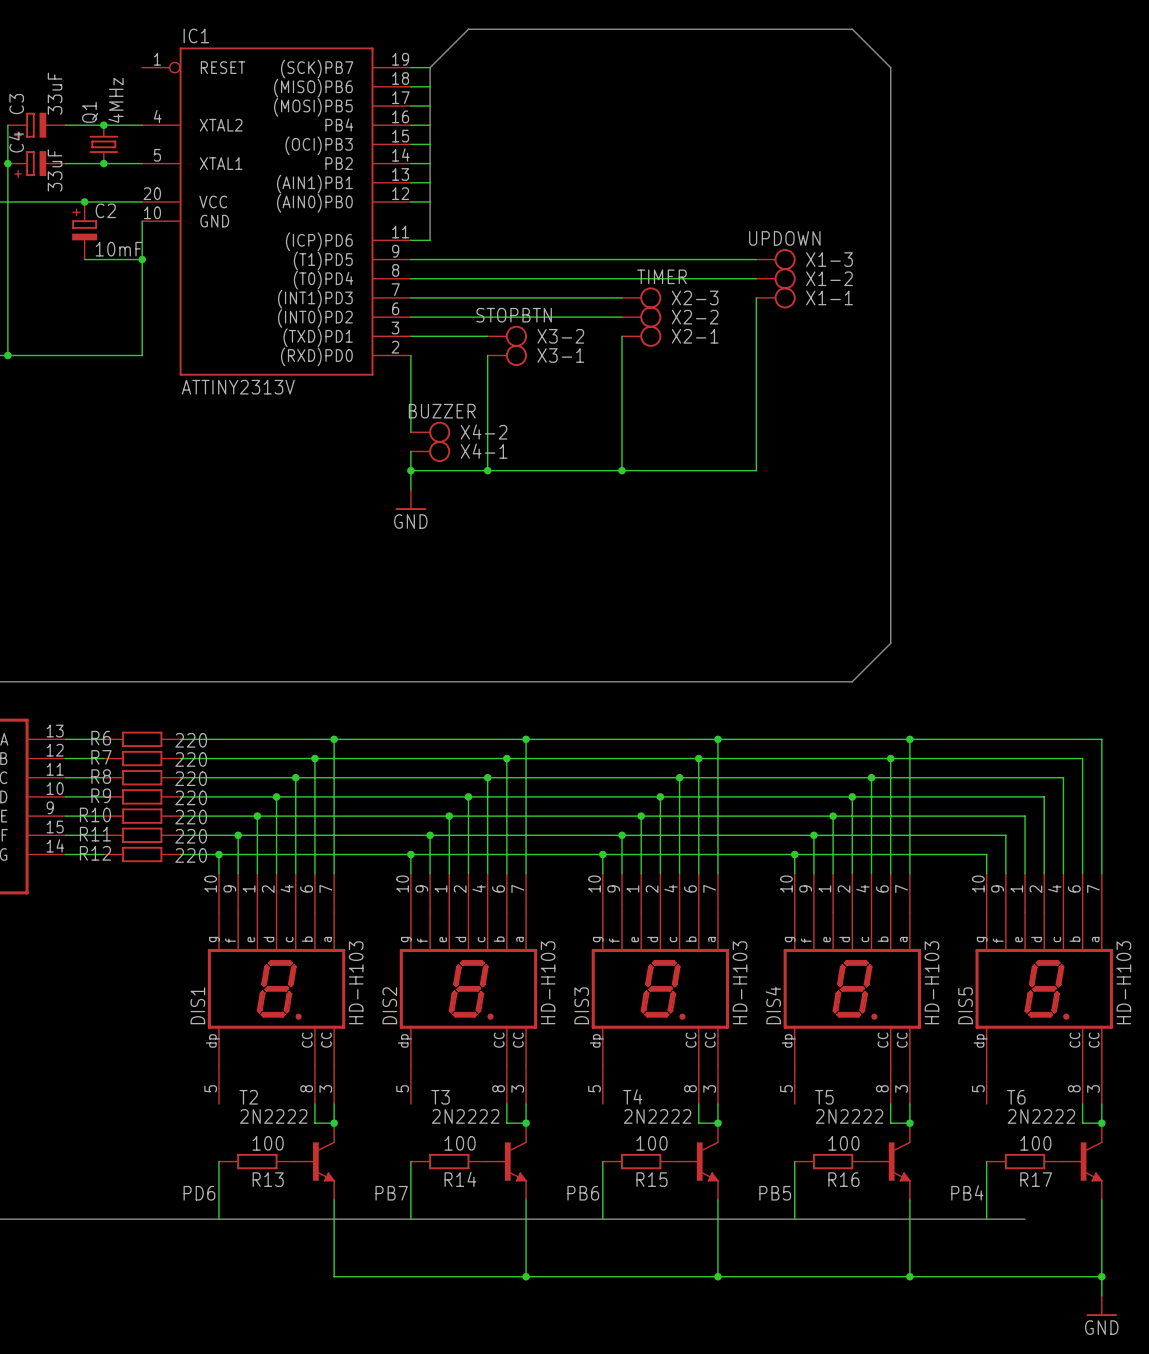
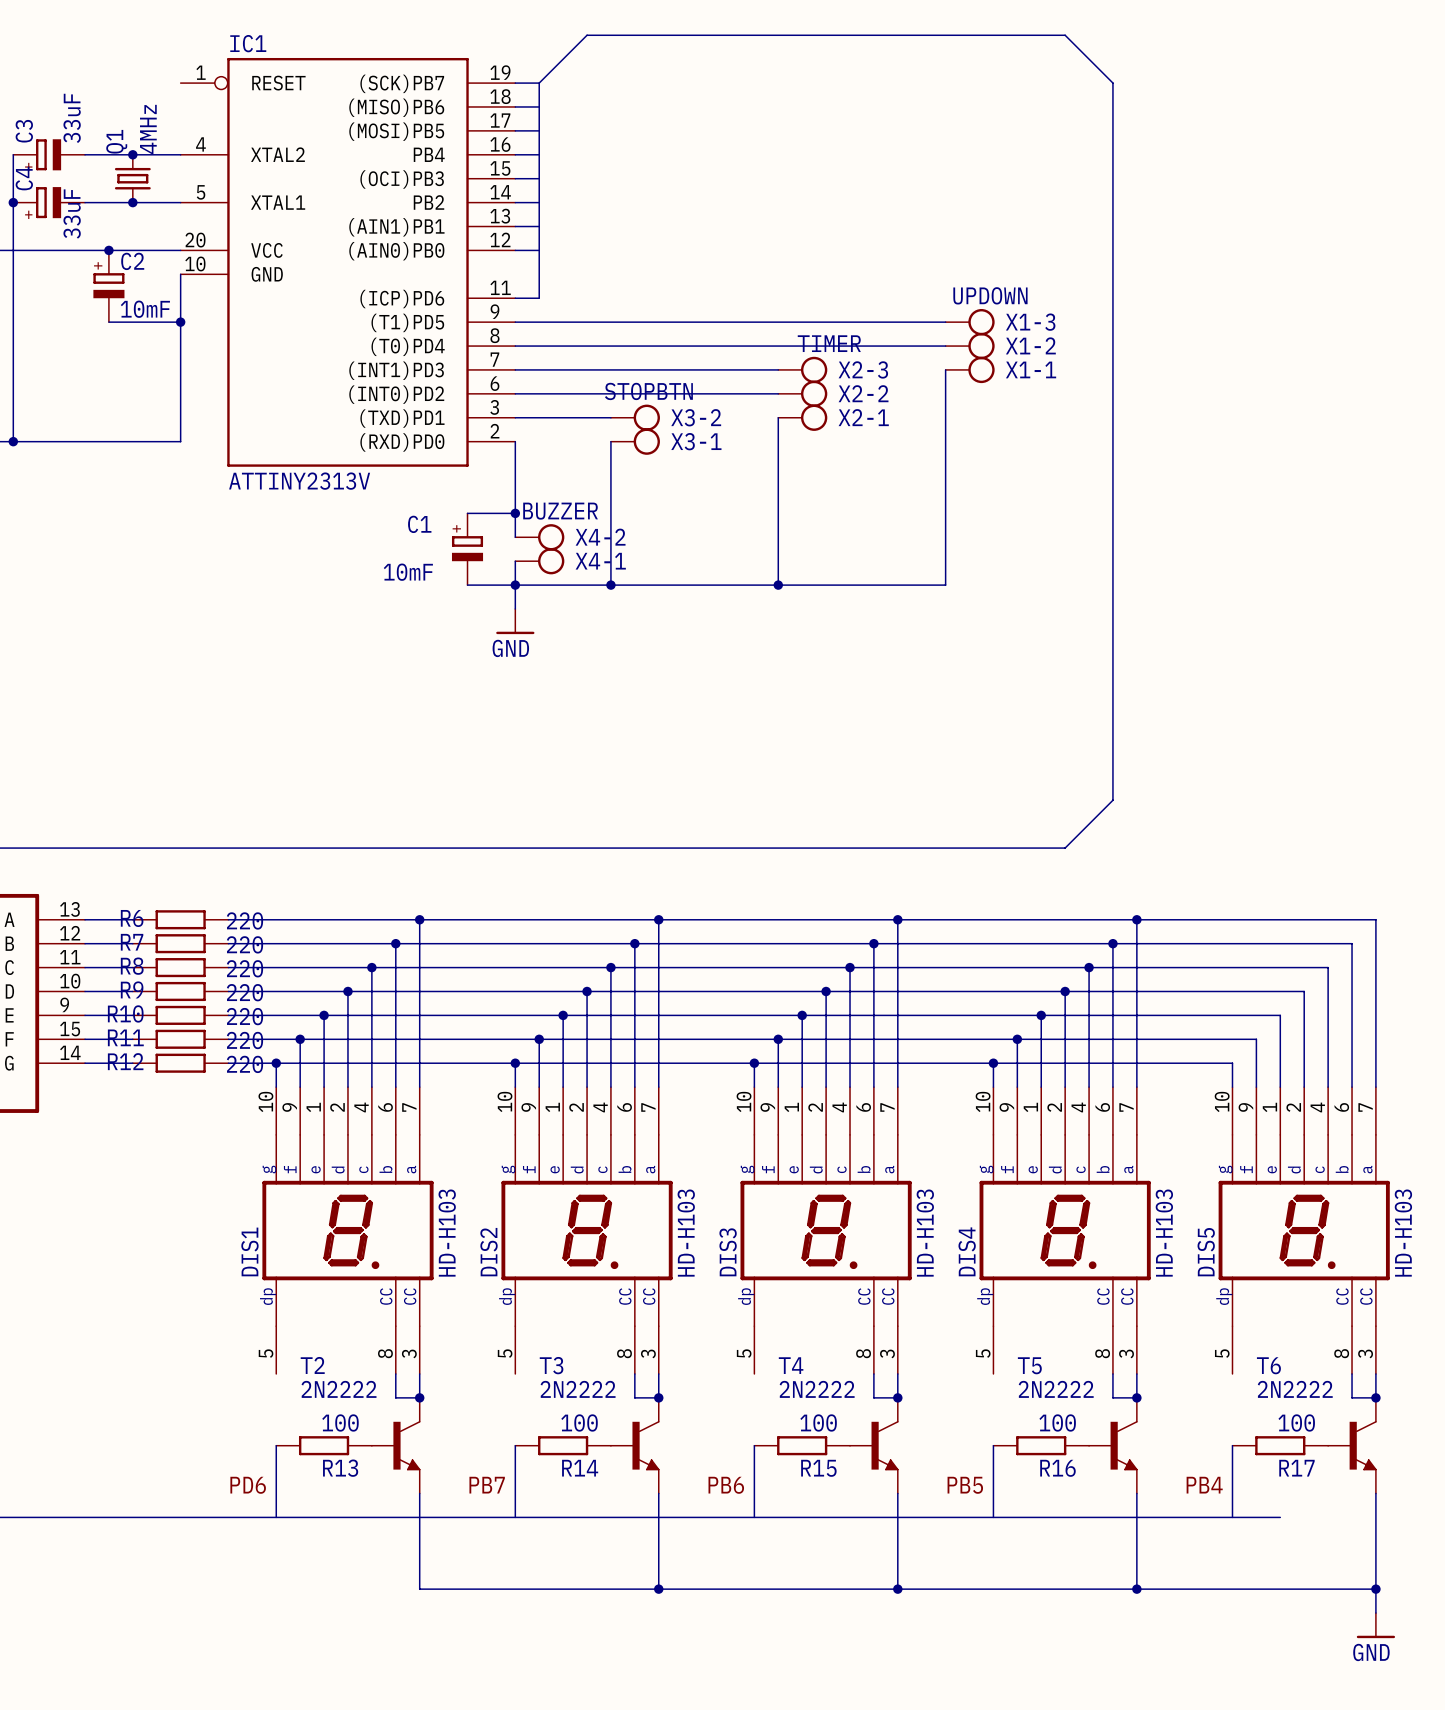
wire: none -> (467, 513) (515, 513)
junction: none -> (515, 513)
C1: none -> 10mF (467, 549)
wire: none -> (467, 585) (515, 585)

